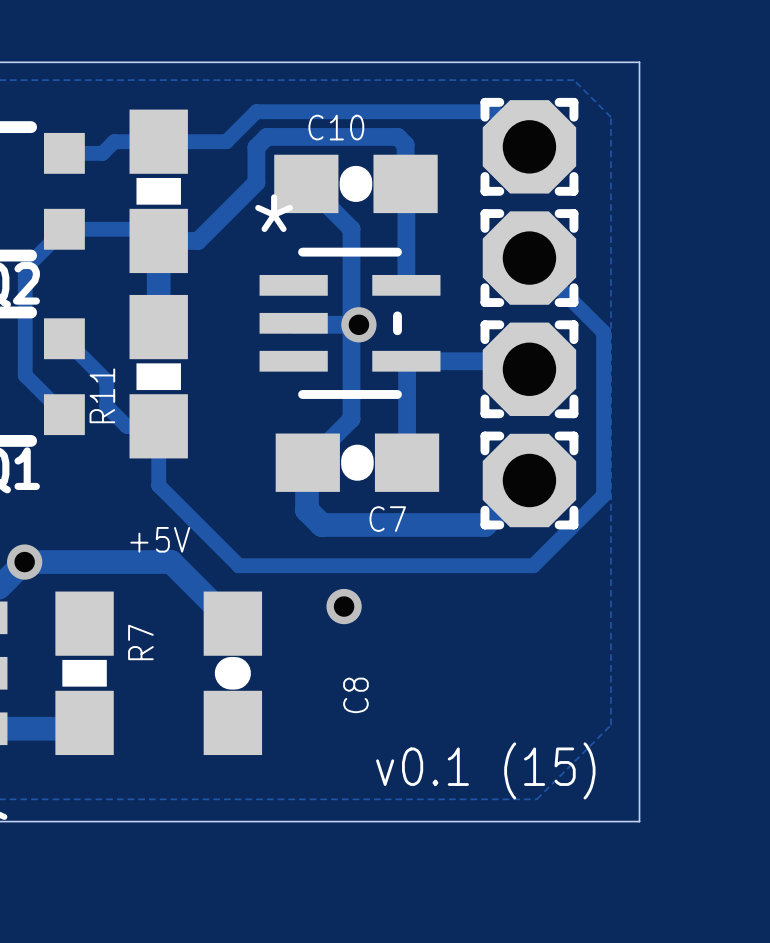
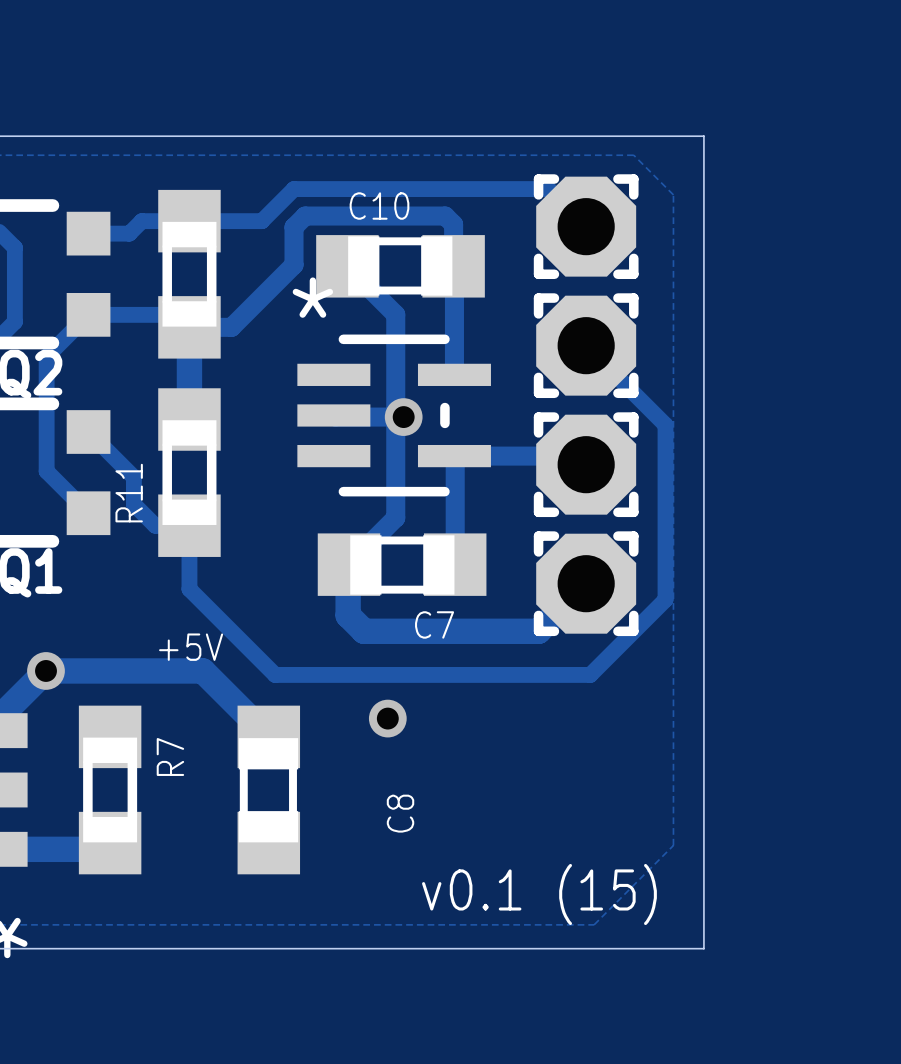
part footprint: [129, 109, 188, 274] -> [158, 189, 221, 359]
C10 footprint: [274, 154, 438, 214] -> [316, 235, 485, 298]
R11 footprint: [129, 294, 188, 459] -> [158, 388, 221, 557]
C7 footprint: [275, 433, 440, 492] -> [317, 533, 487, 596]
R7 footprint: [55, 591, 114, 756] -> [78, 705, 142, 875]
C8 footprint: [203, 591, 263, 756] -> [237, 705, 301, 875]

